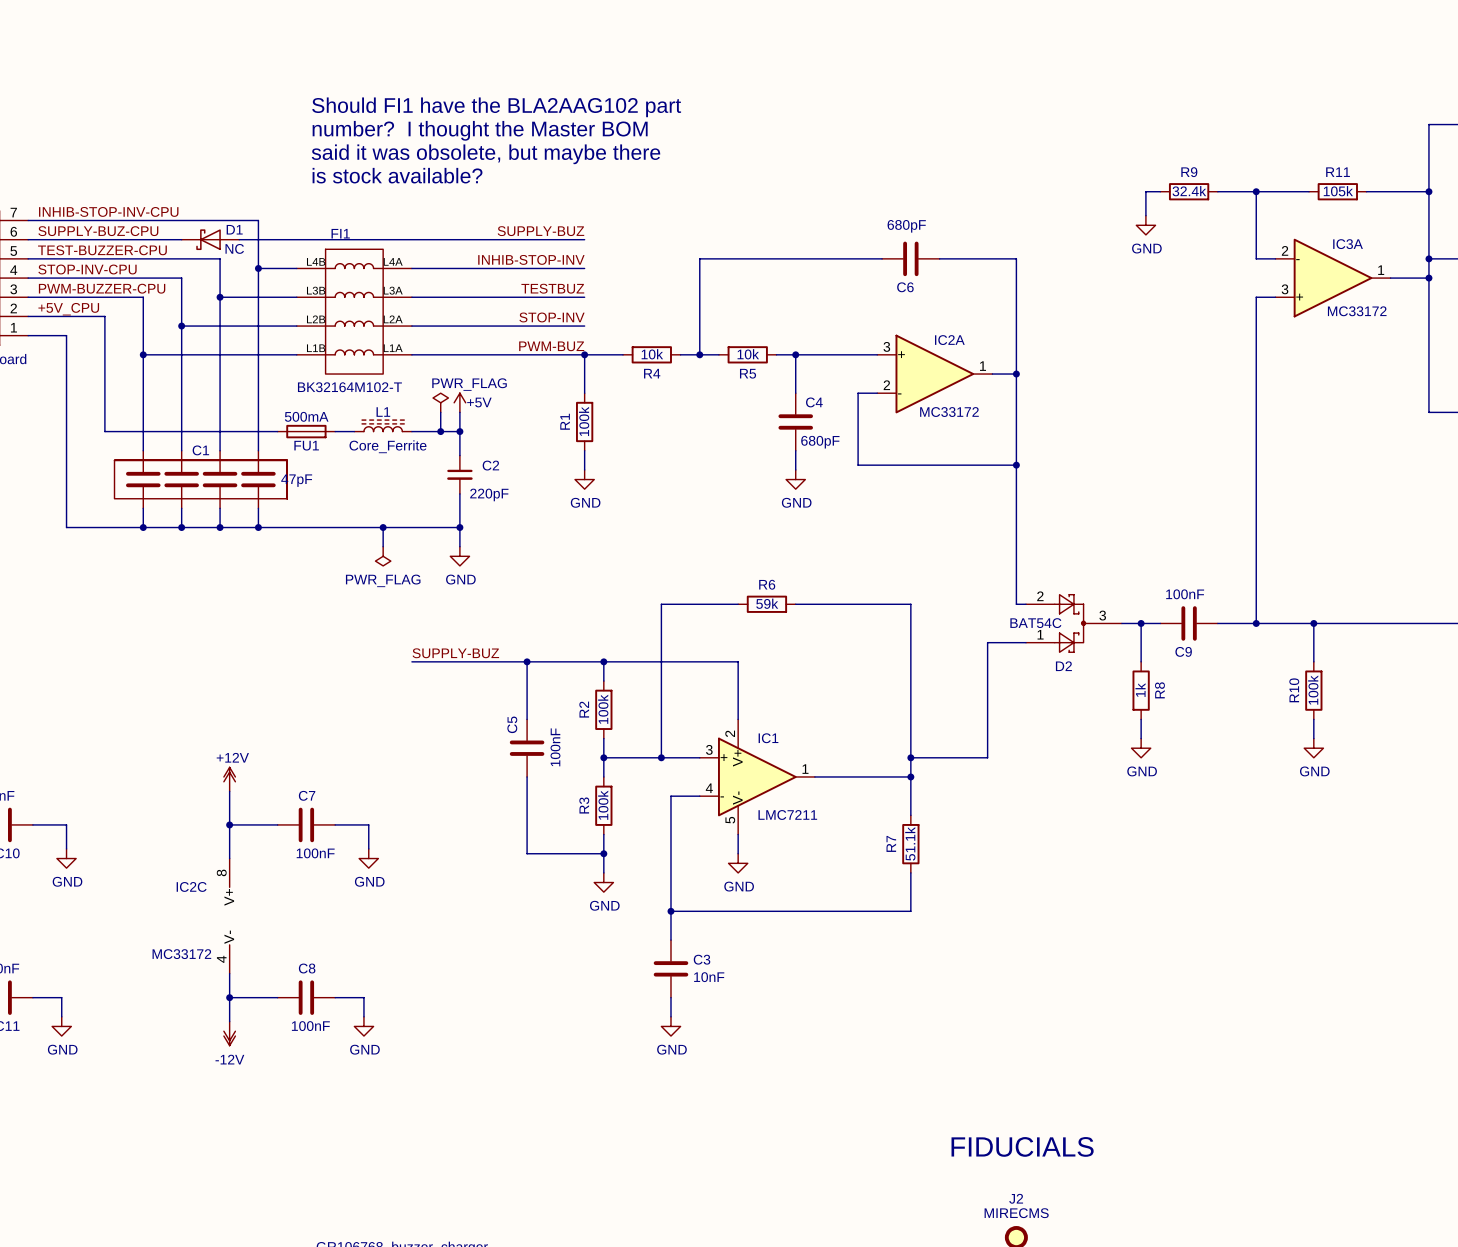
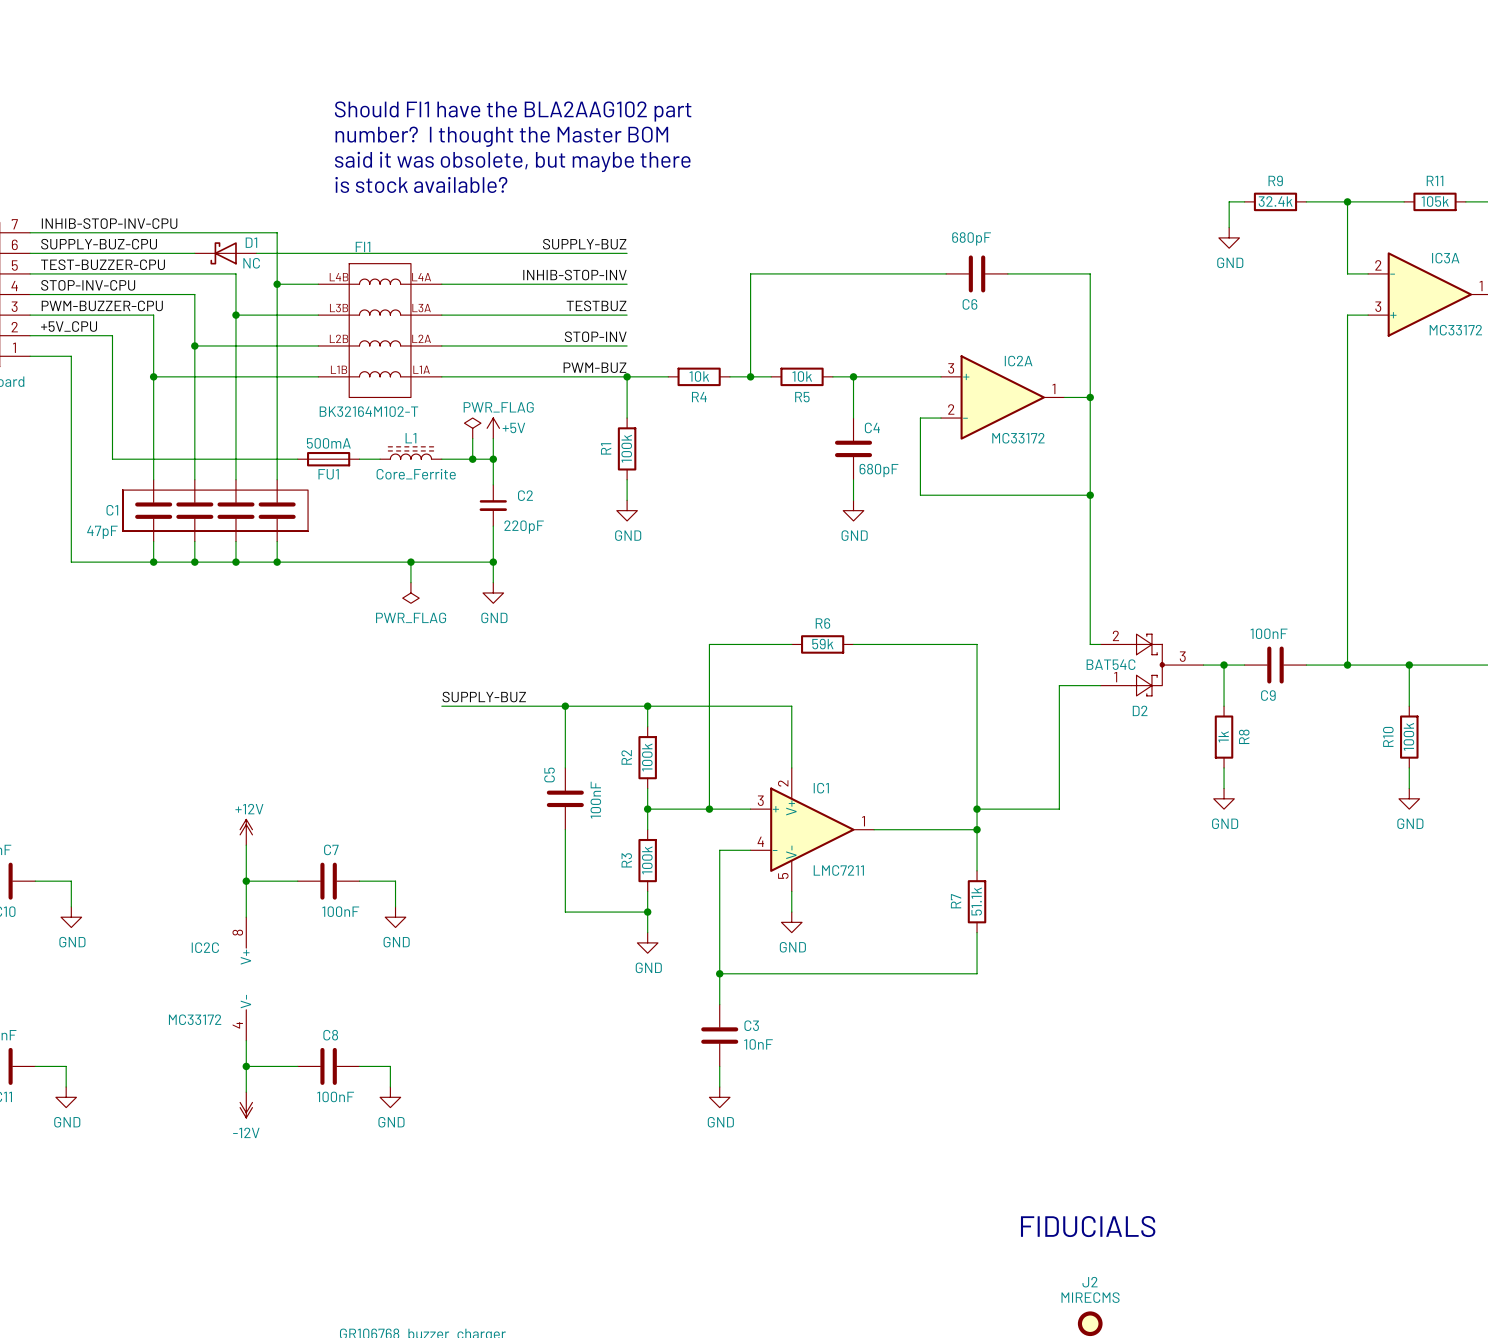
C1 name position: C1 (200, 450) -> C1 (112, 510)
C1 rotation: 0° (200, 479) -> 180° (215, 510)
C1 value position: 47pF (296, 480) -> 47pF (102, 532)

